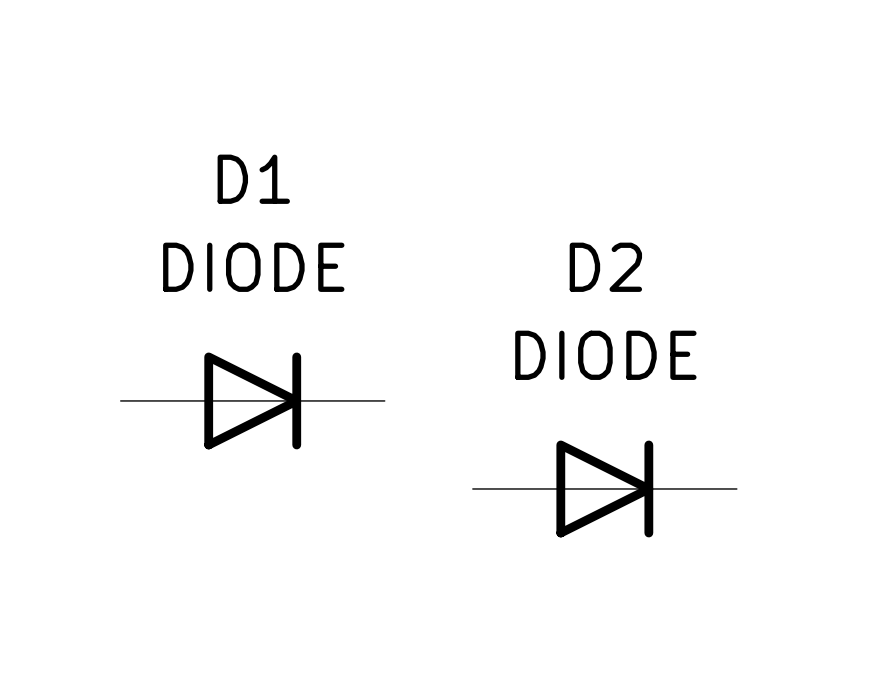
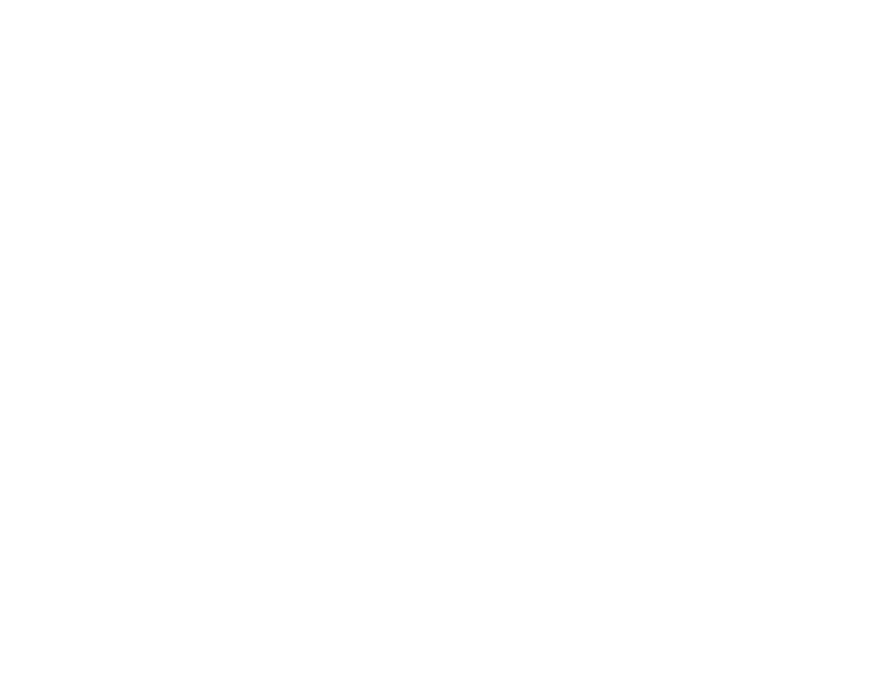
D1: DIODE (252, 400) -> none
D2: DIODE (604, 488) -> none

